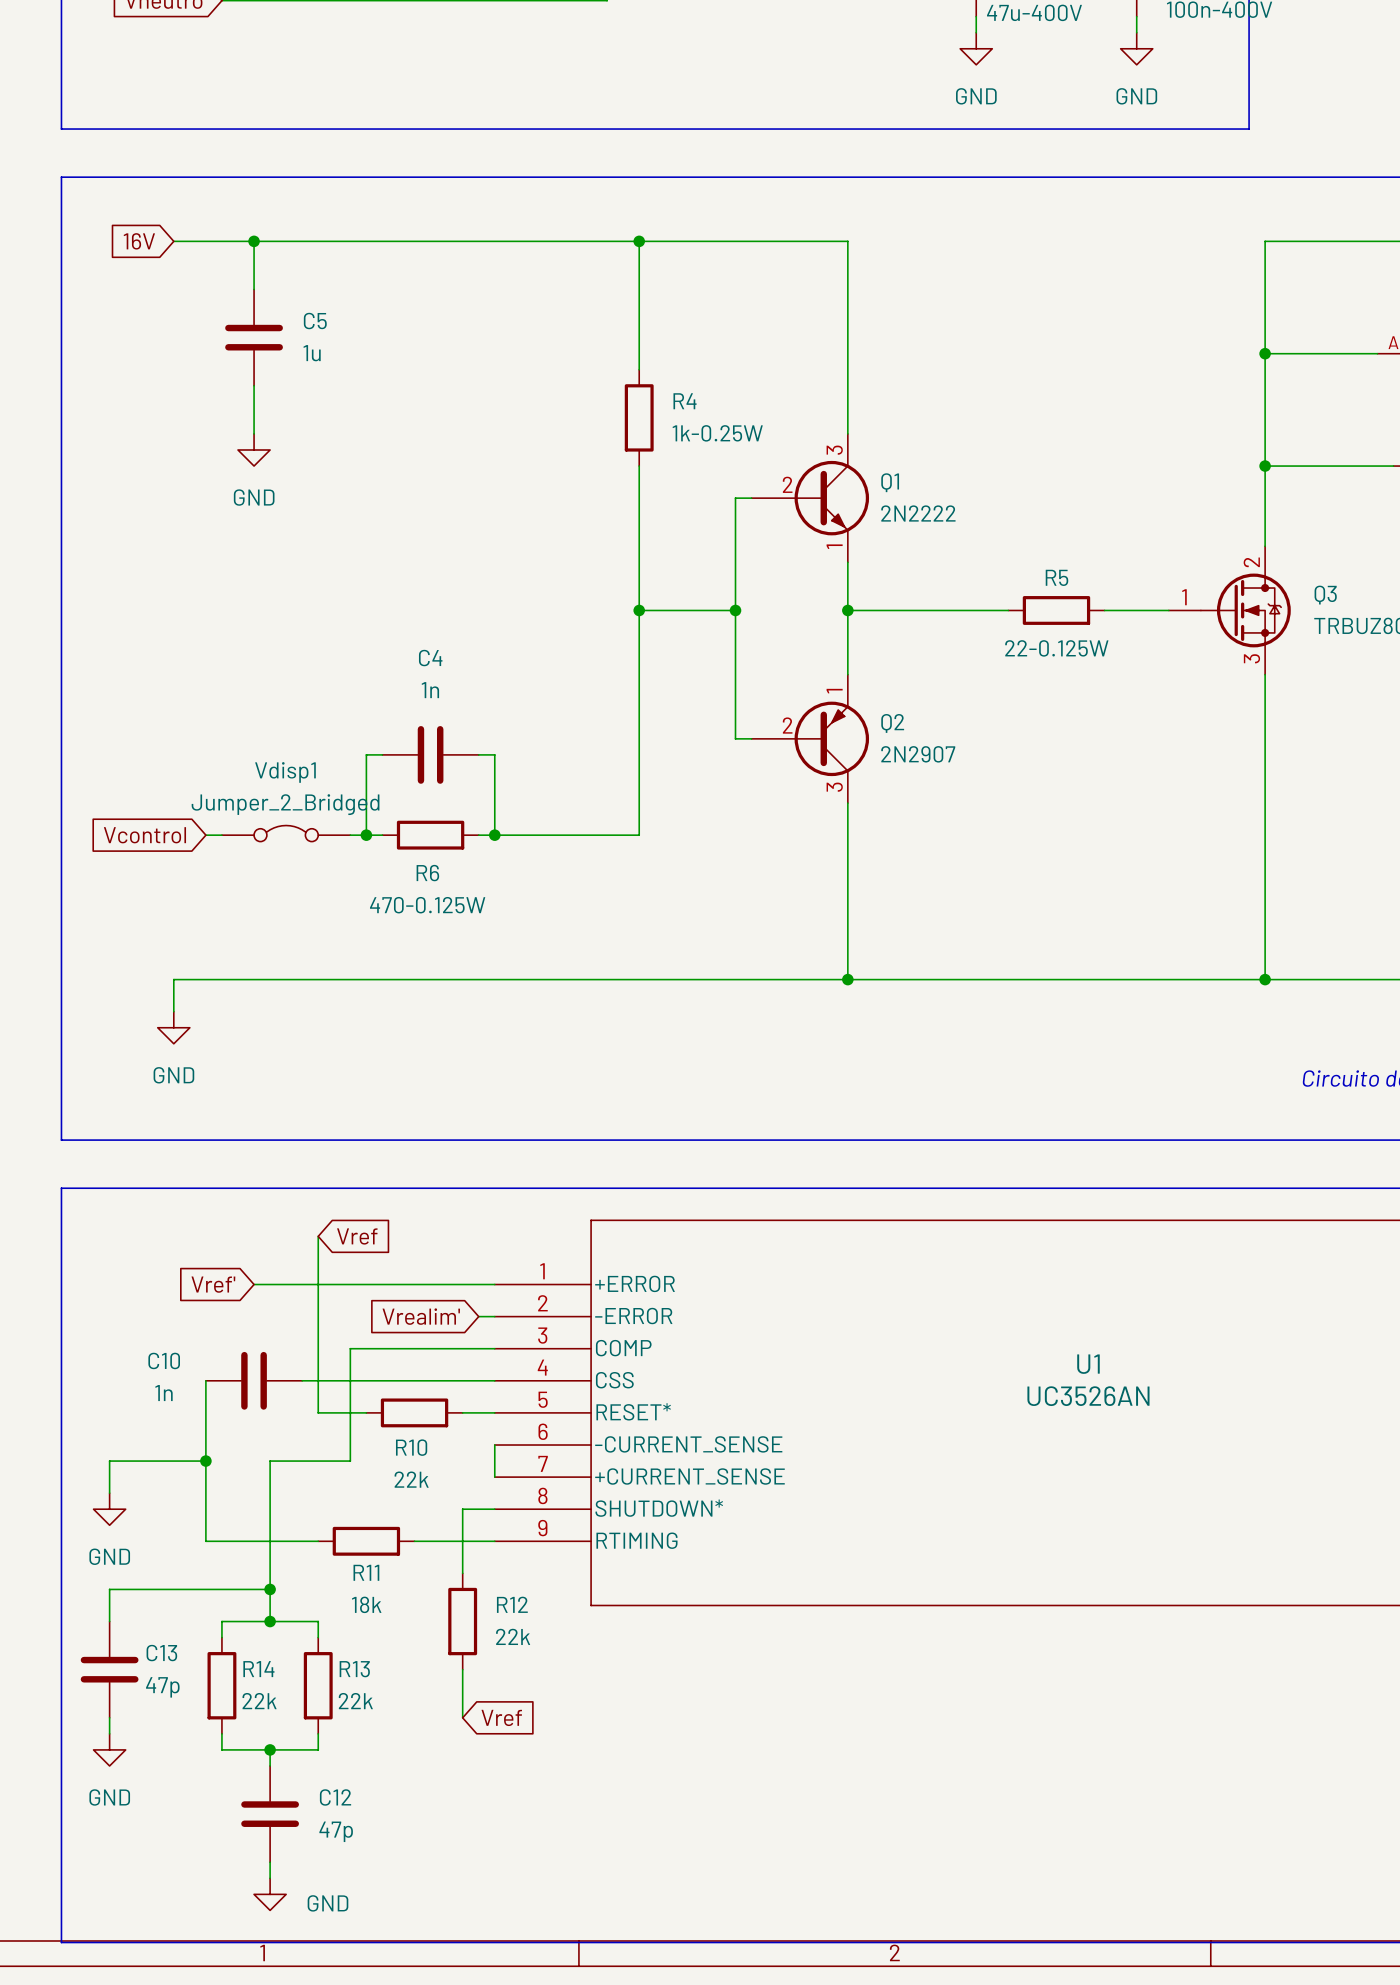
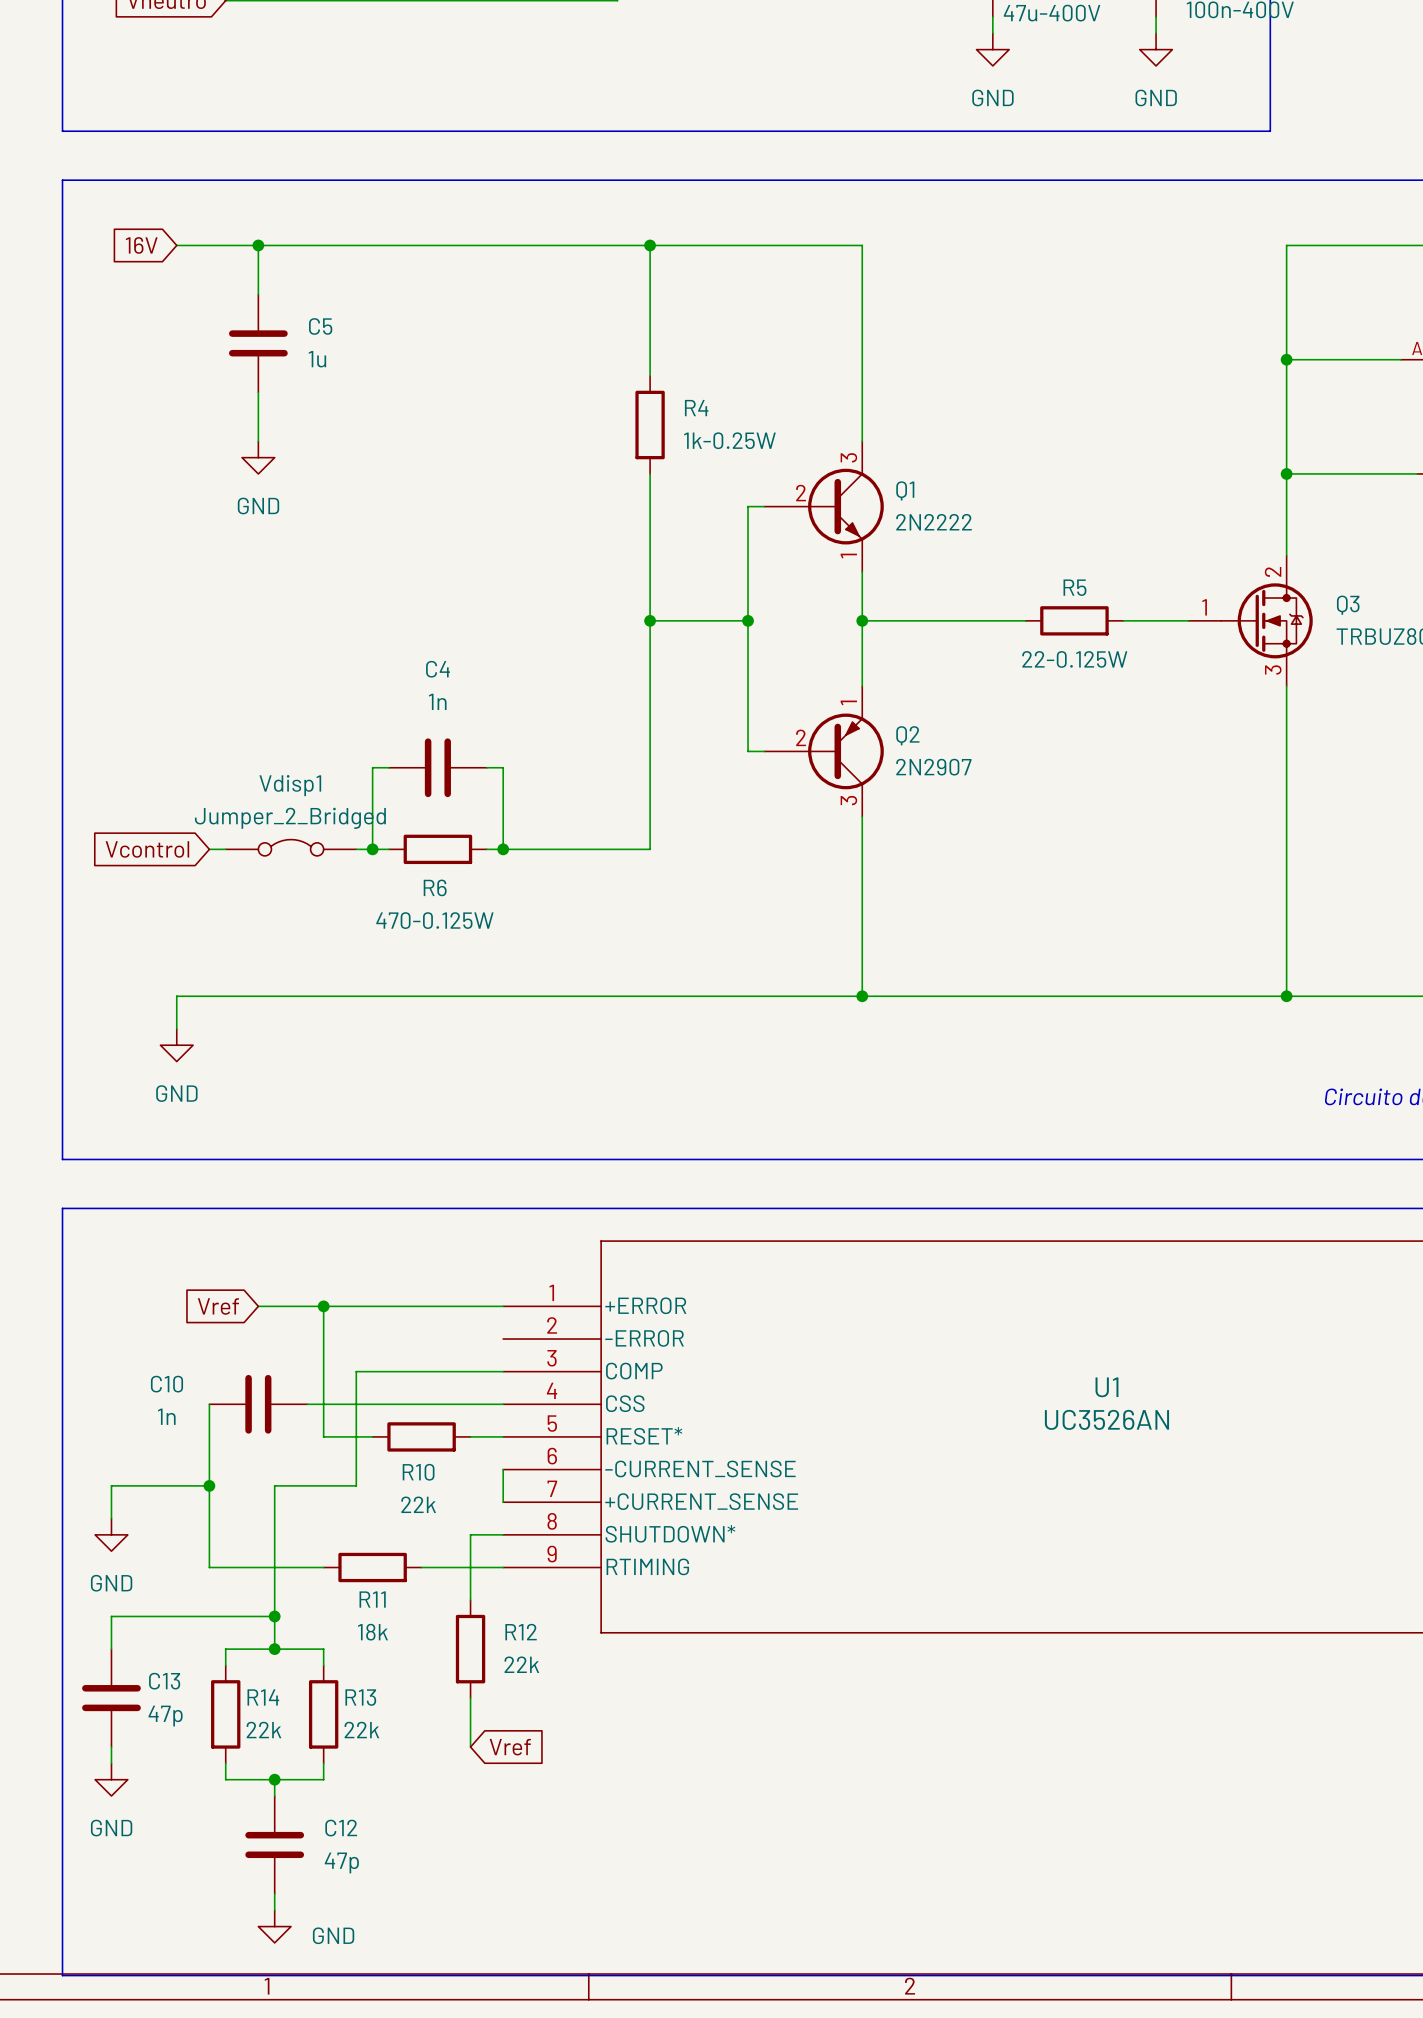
wire: (318, 1236) (318, 1284) -> none
global label: Vref (357, 1236) -> none
global label: Vref' (213, 1284) -> Vref (218, 1306)
junction: none -> (323, 1306)
global label: Vrealim' (421, 1316) -> none
wire: (478, 1316) (494, 1316) -> none

